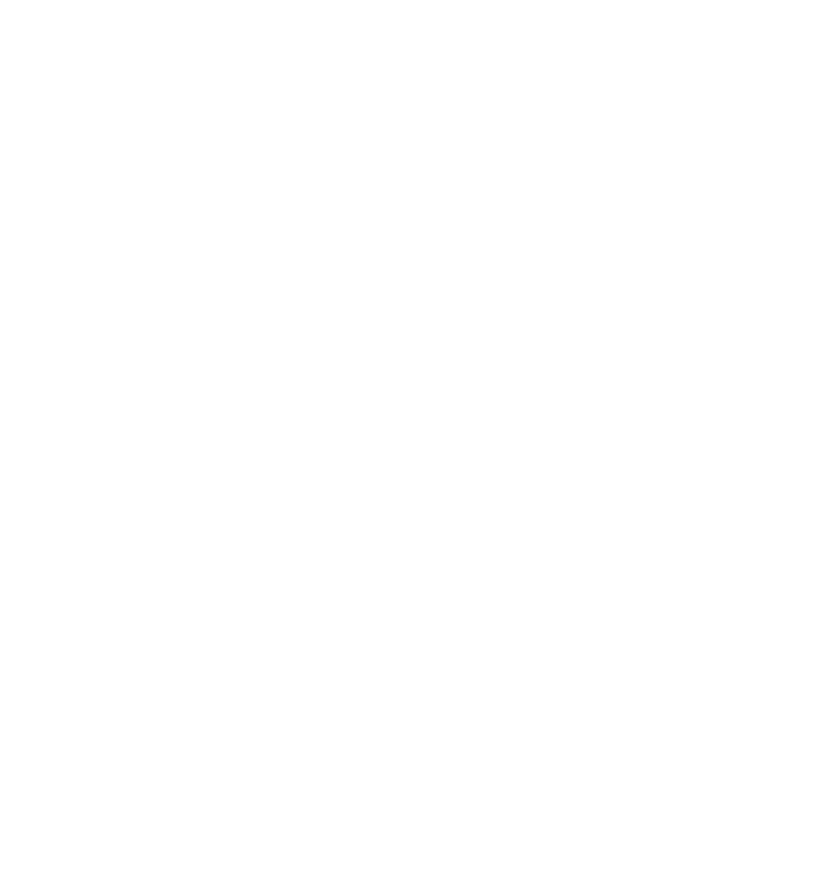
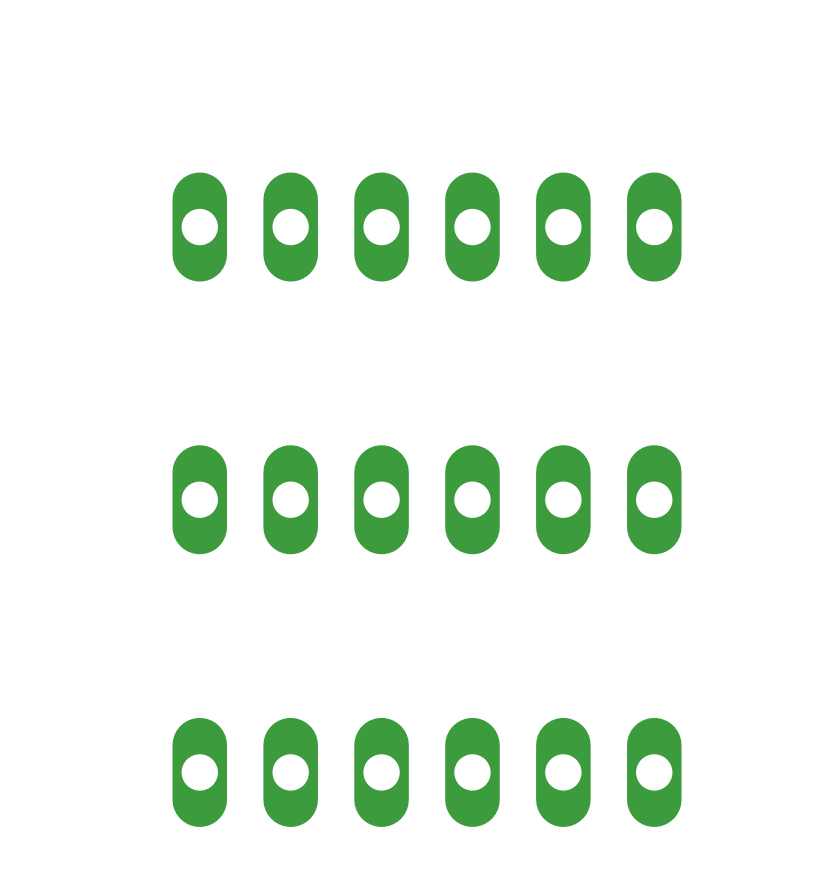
part: none -> (427, 227)
part: none -> (427, 499)
part: none -> (427, 772)

